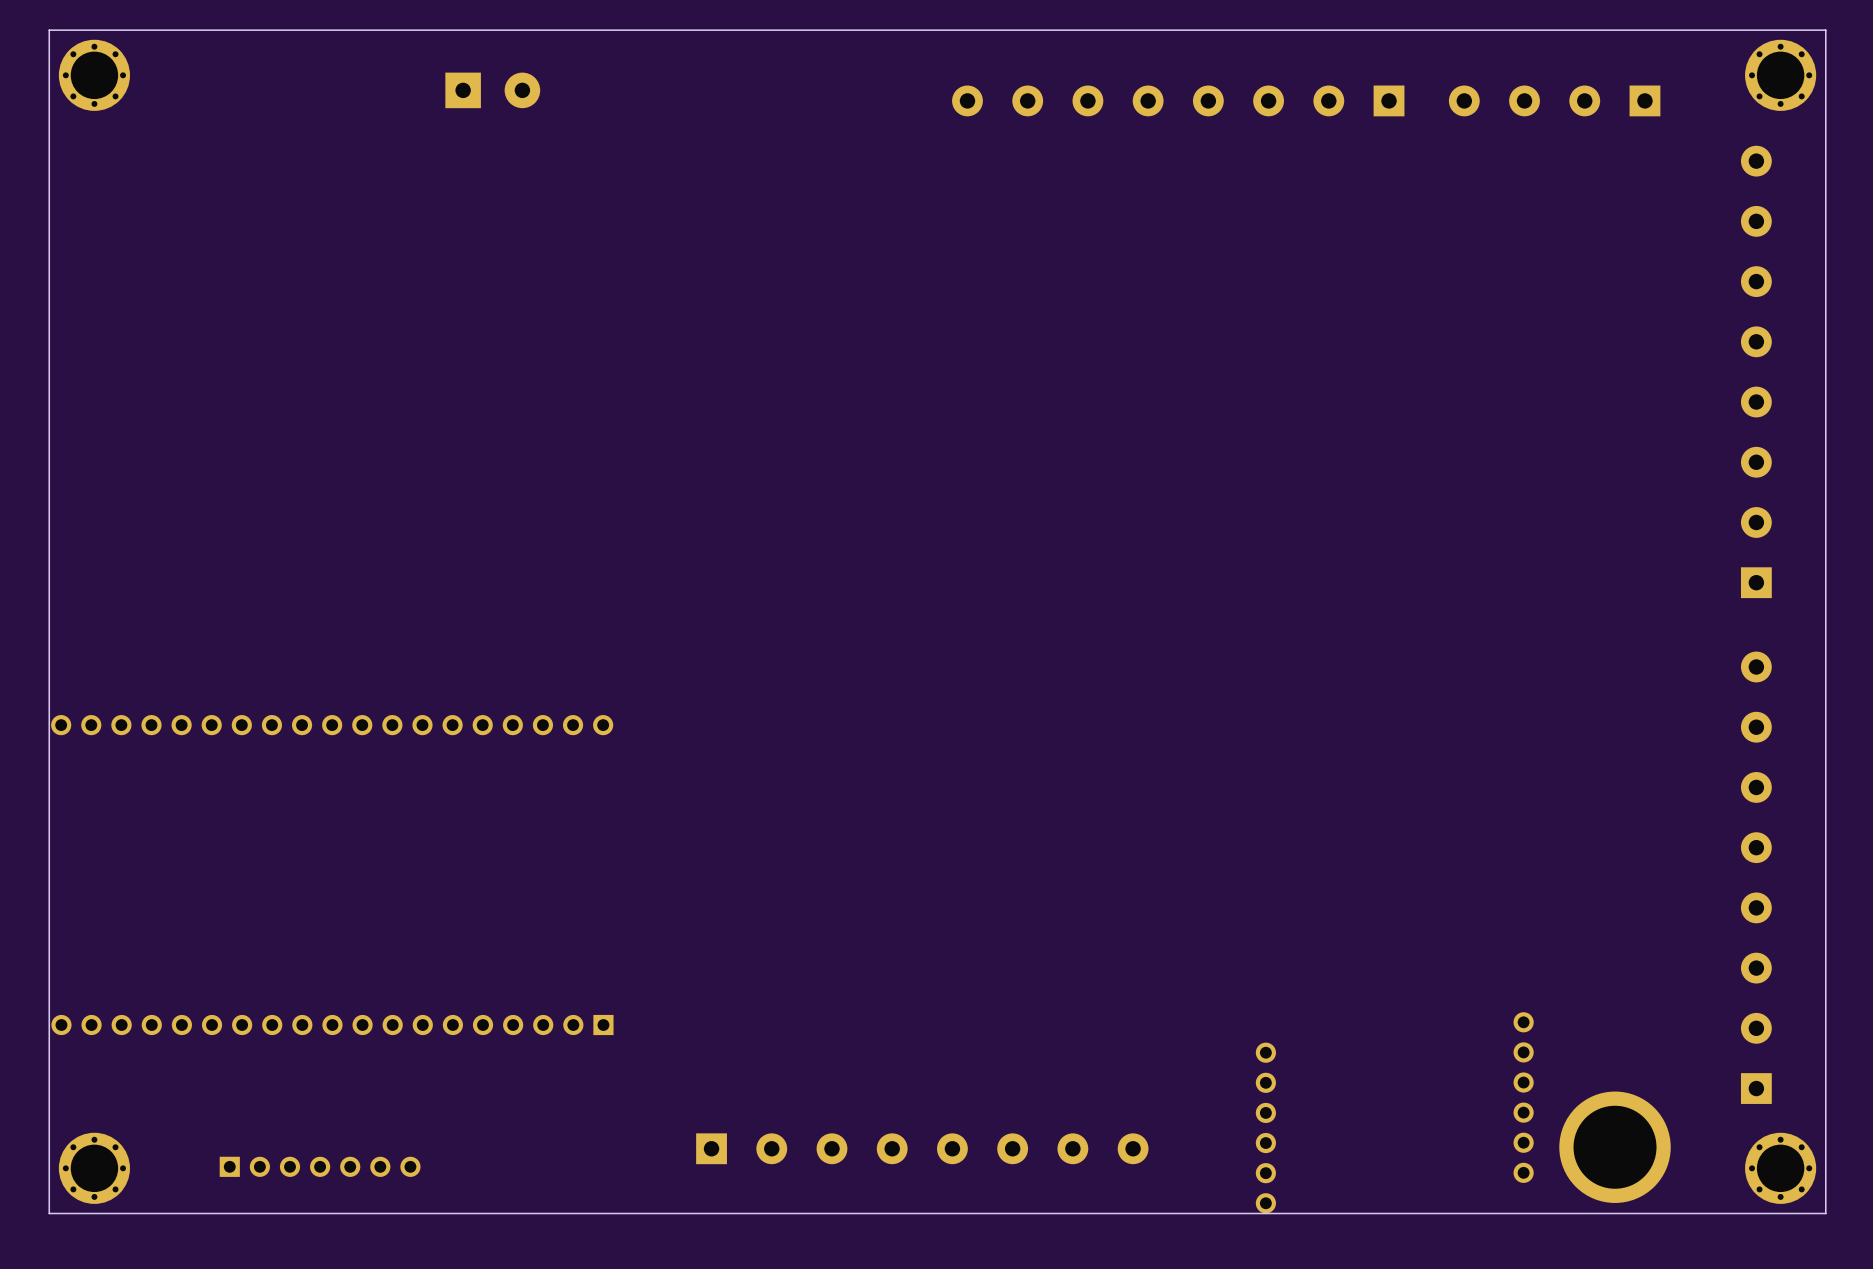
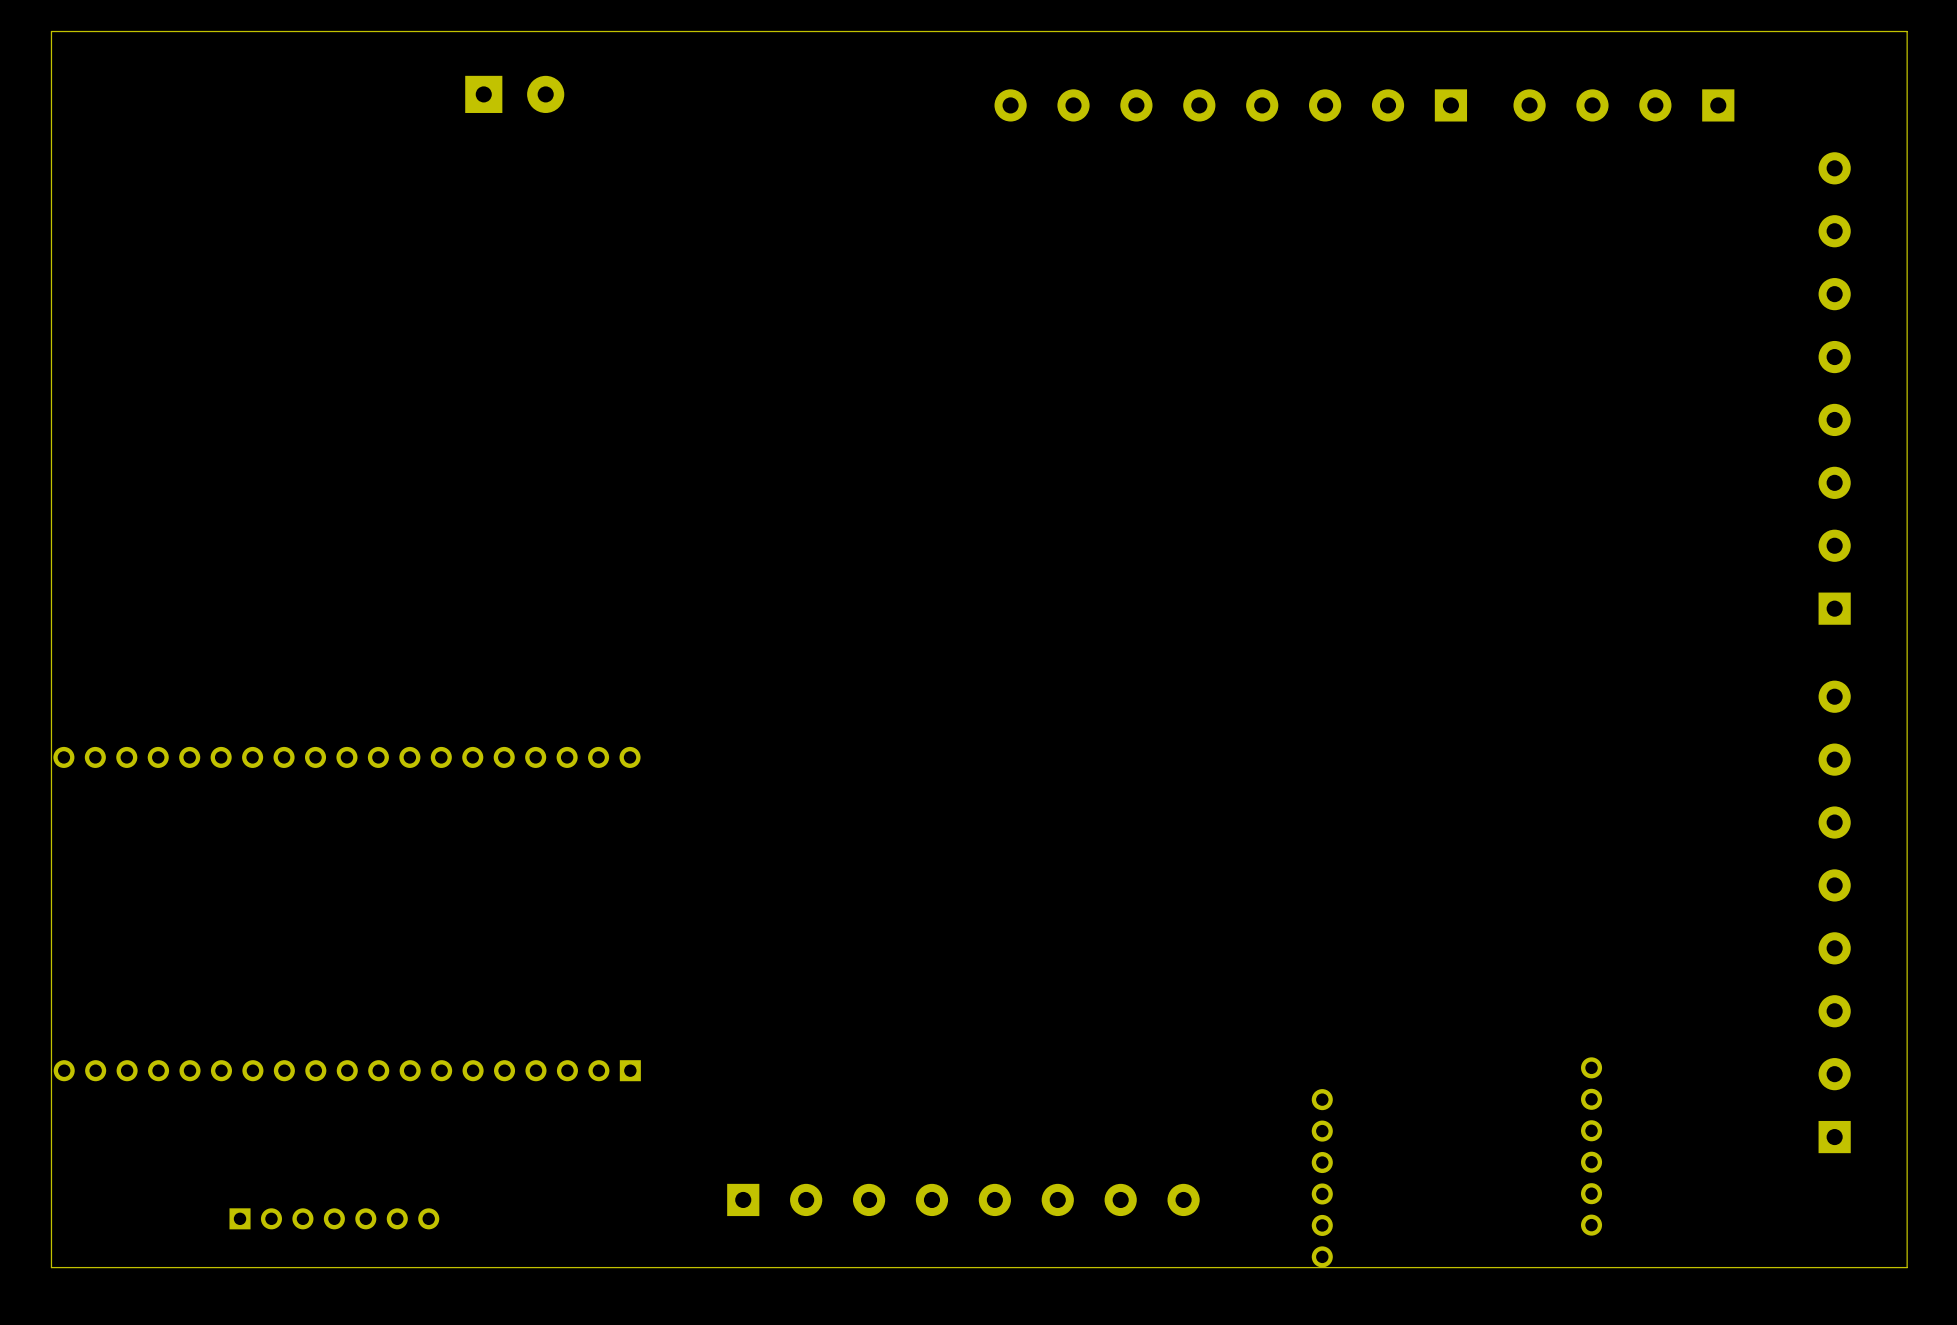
part: (94, 75) -> none
part: (1780, 75) -> none
part: (1615, 1147) -> none
part: (94, 1168) -> none
part: (1780, 1168) -> none

